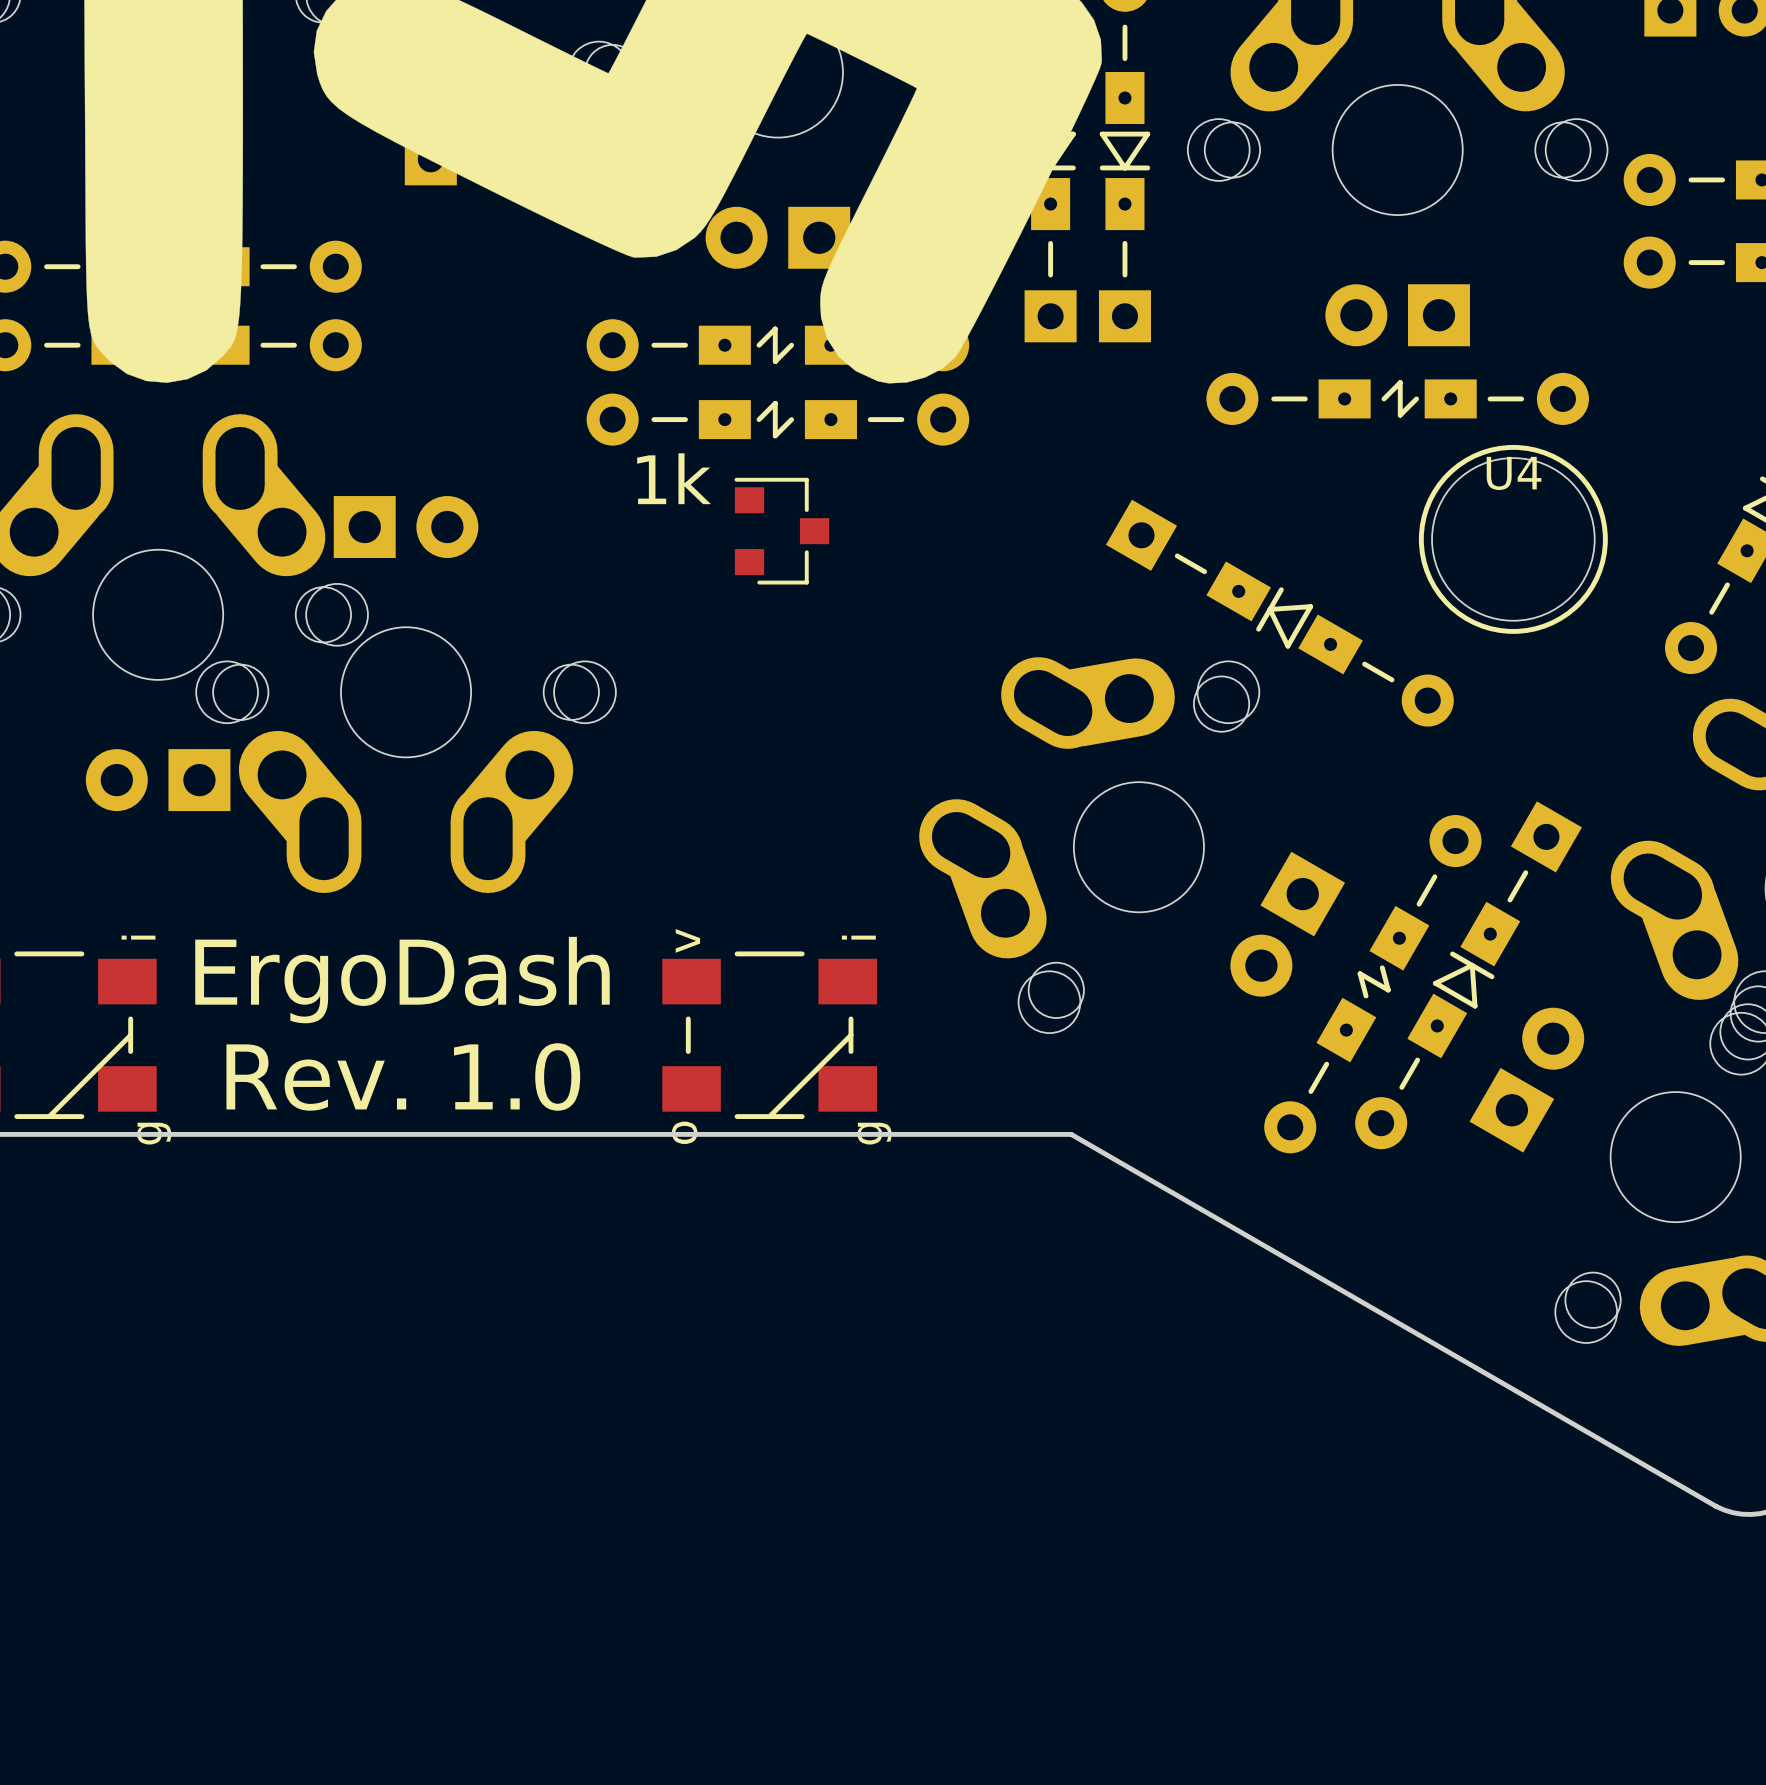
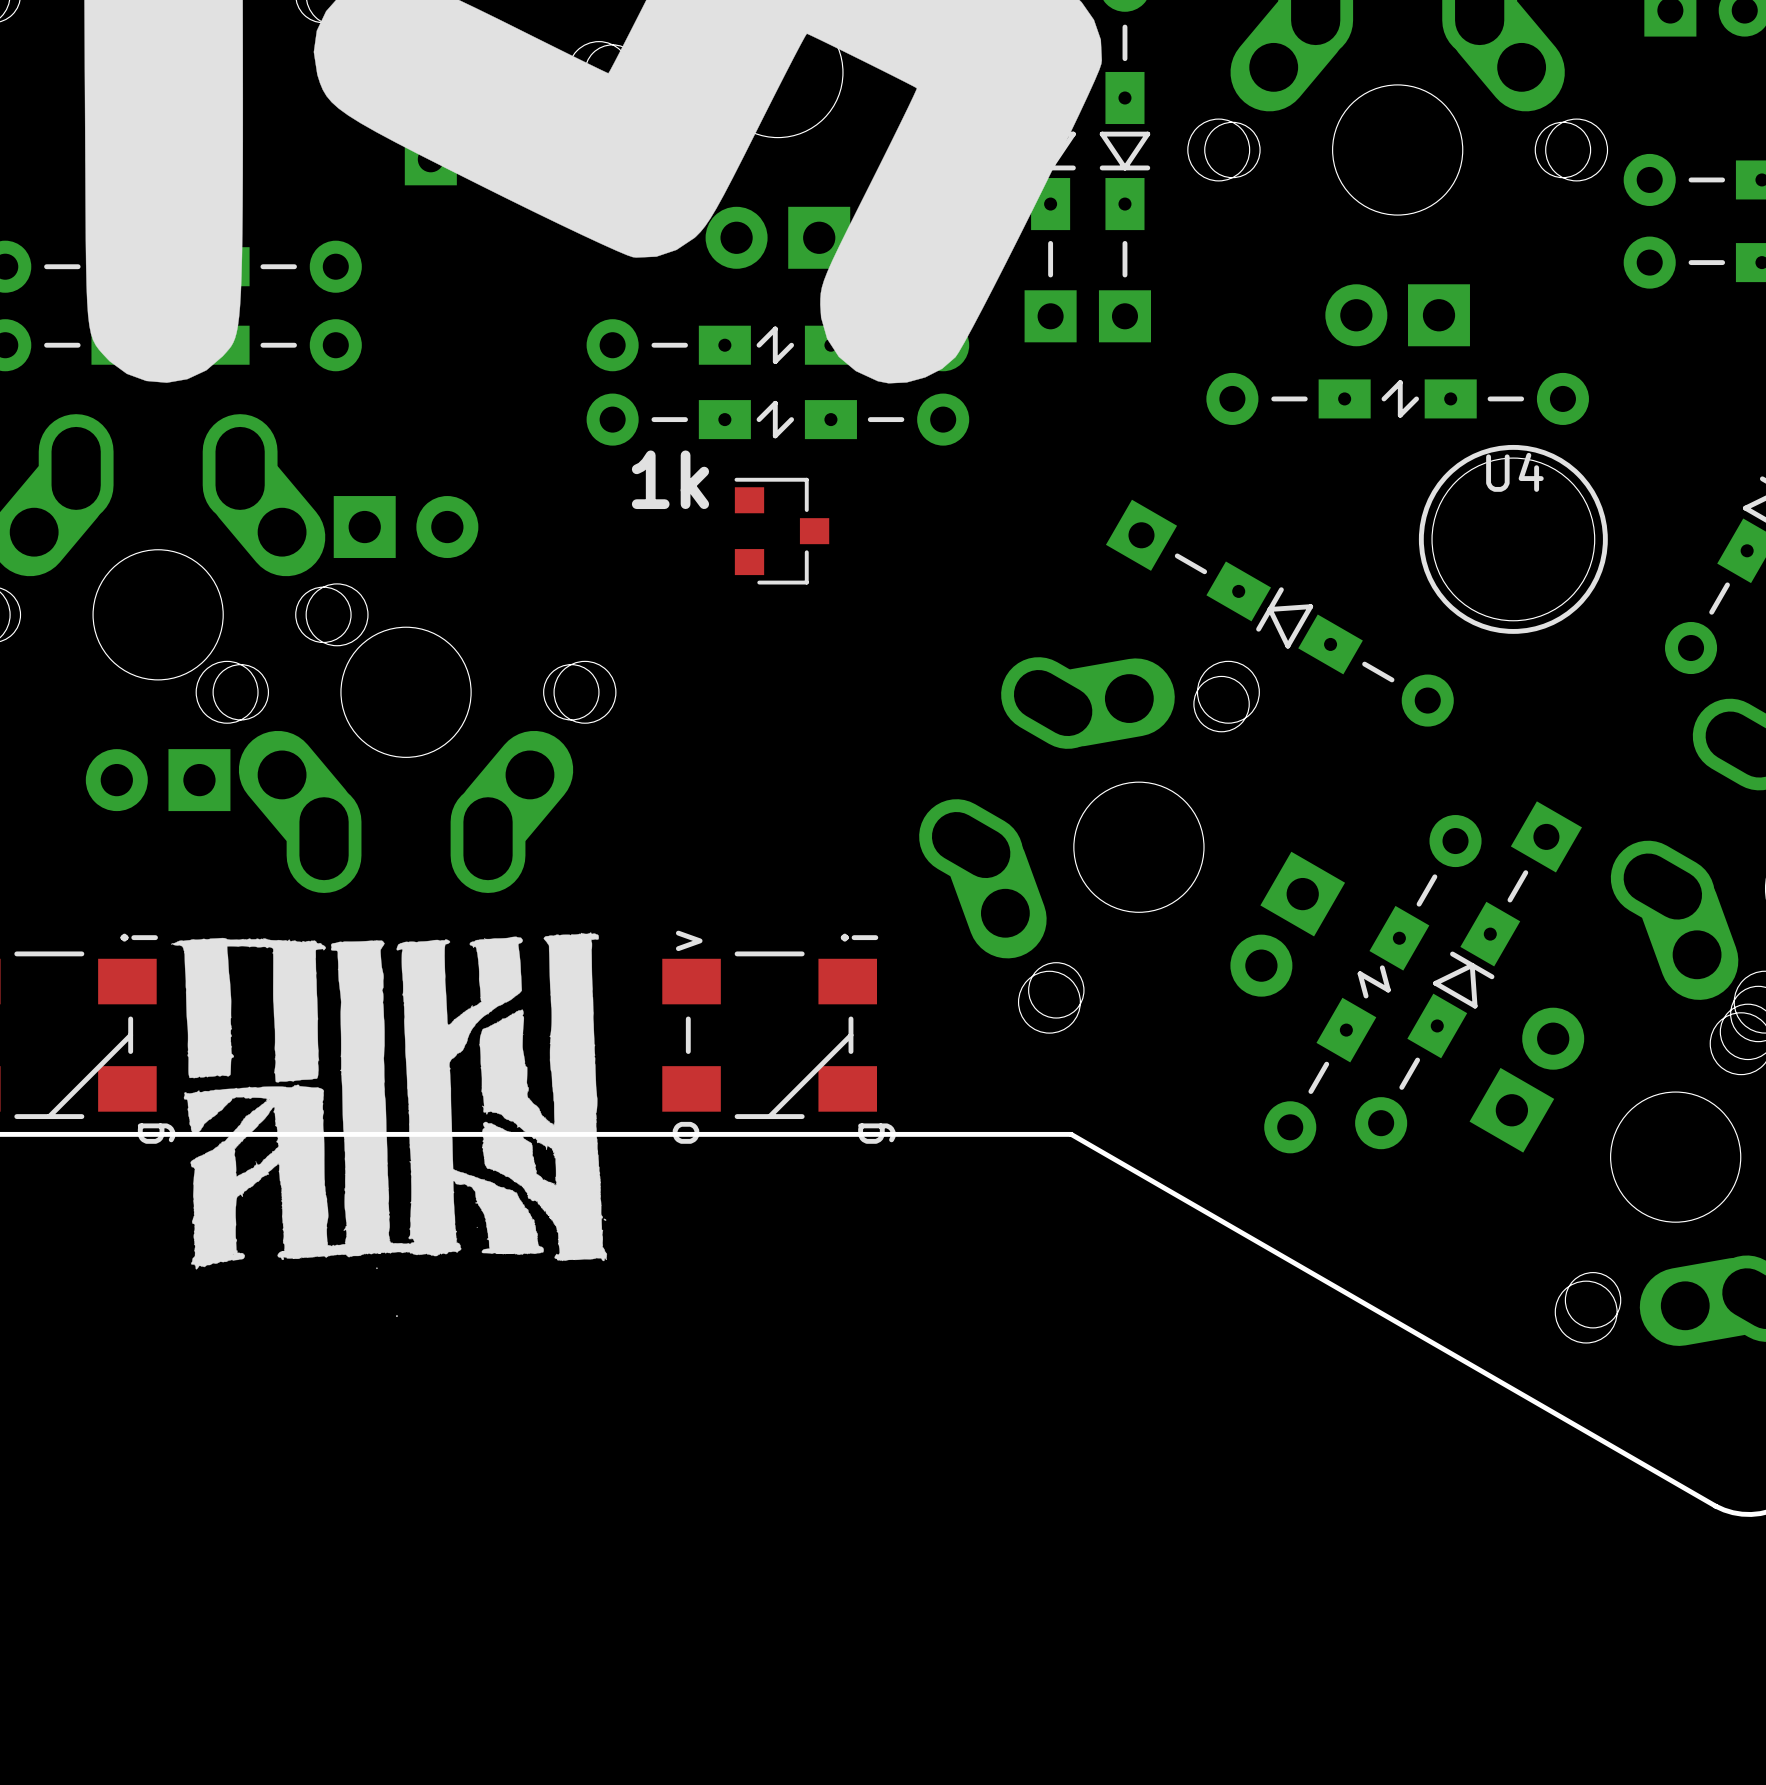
drawing: none -> [171, 932, 608, 1317]
text: ErgoDash (402, 980) -> none
text: Rev. 1.0 (403, 1076) -> none

